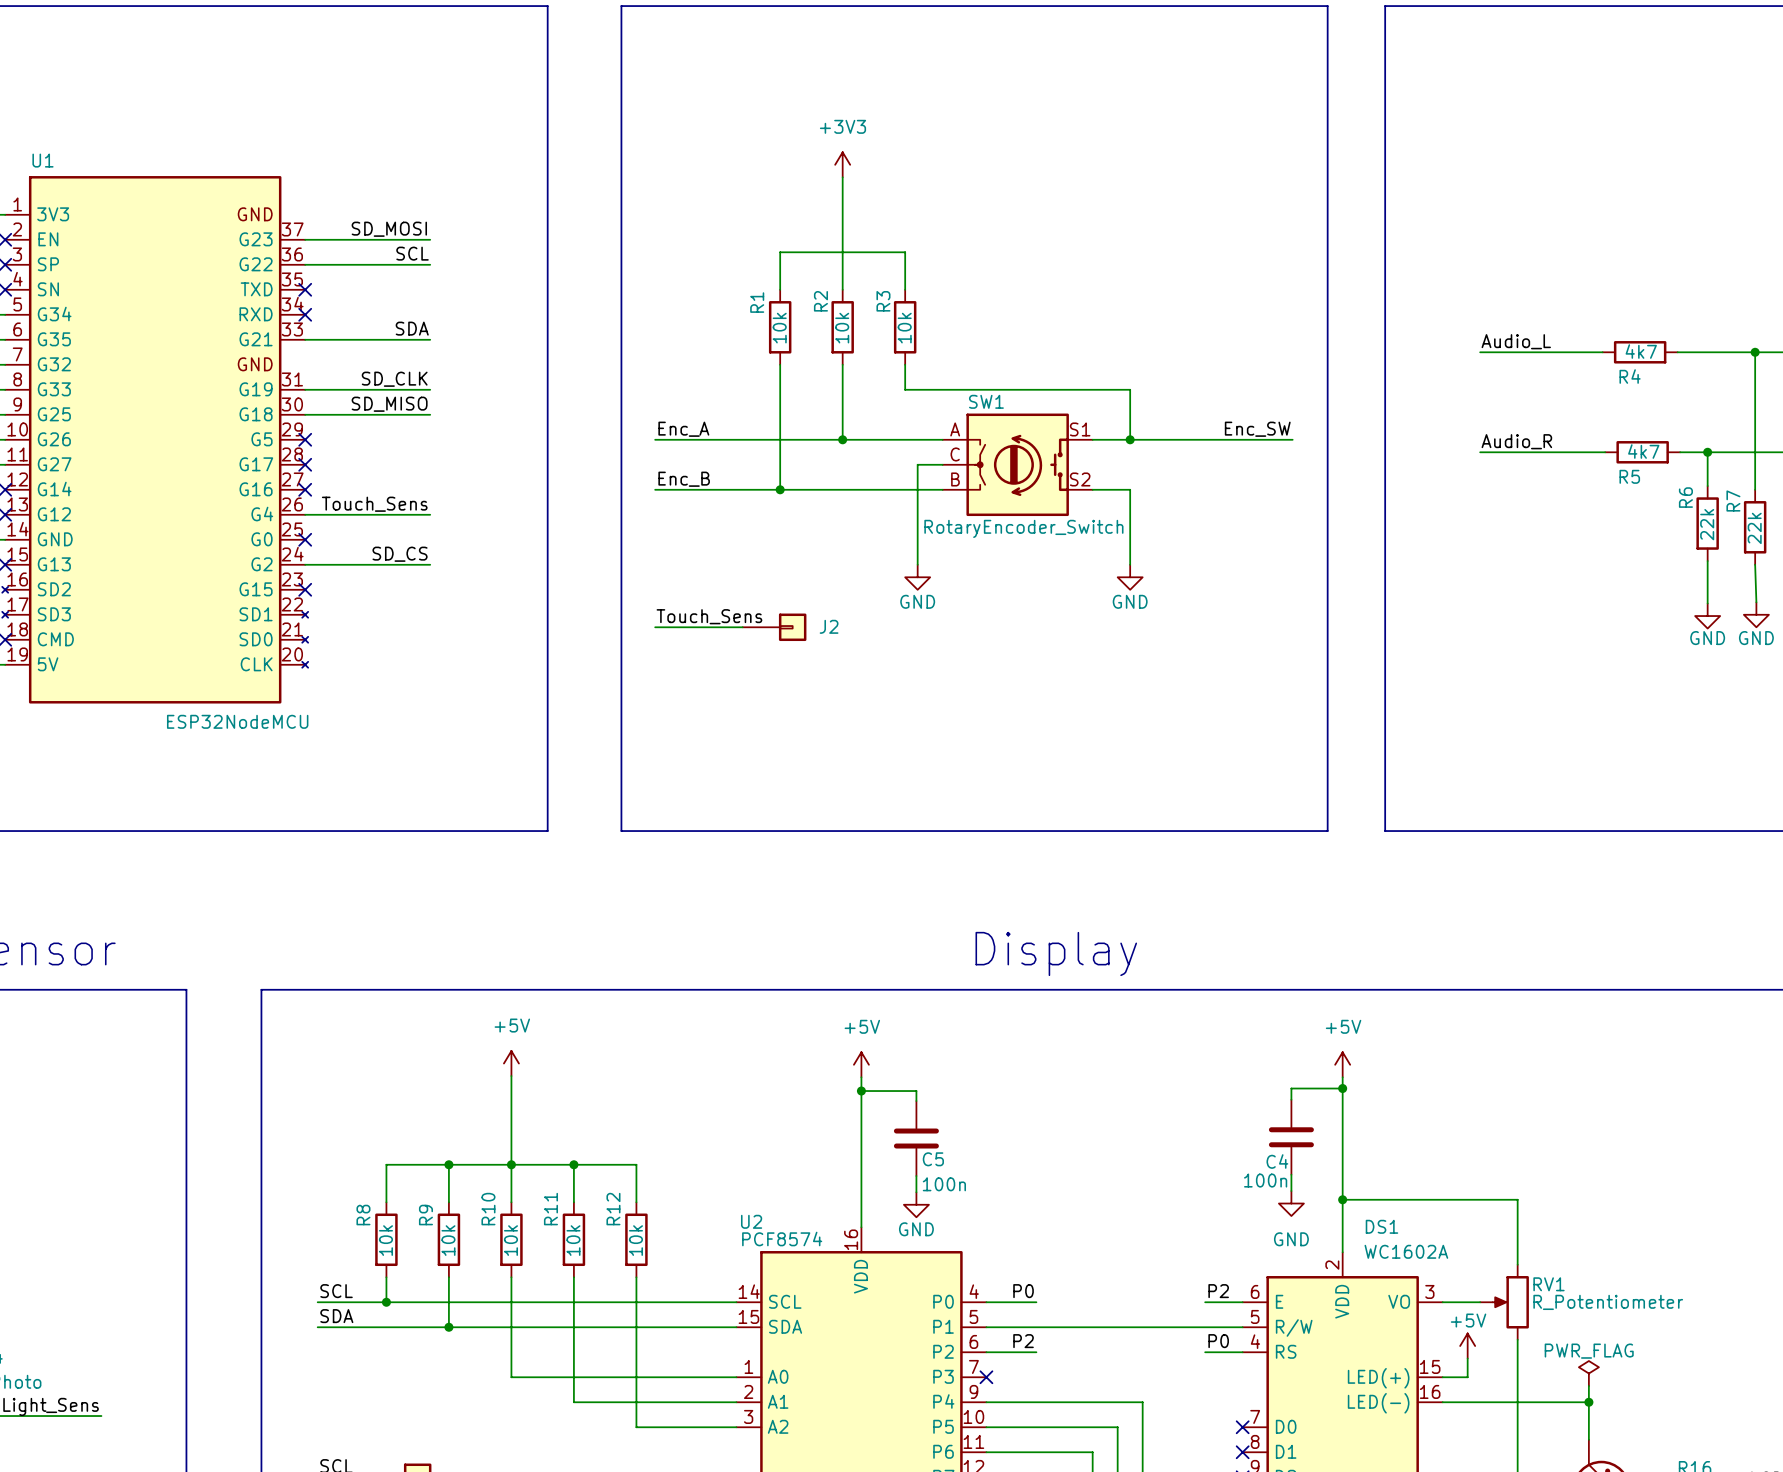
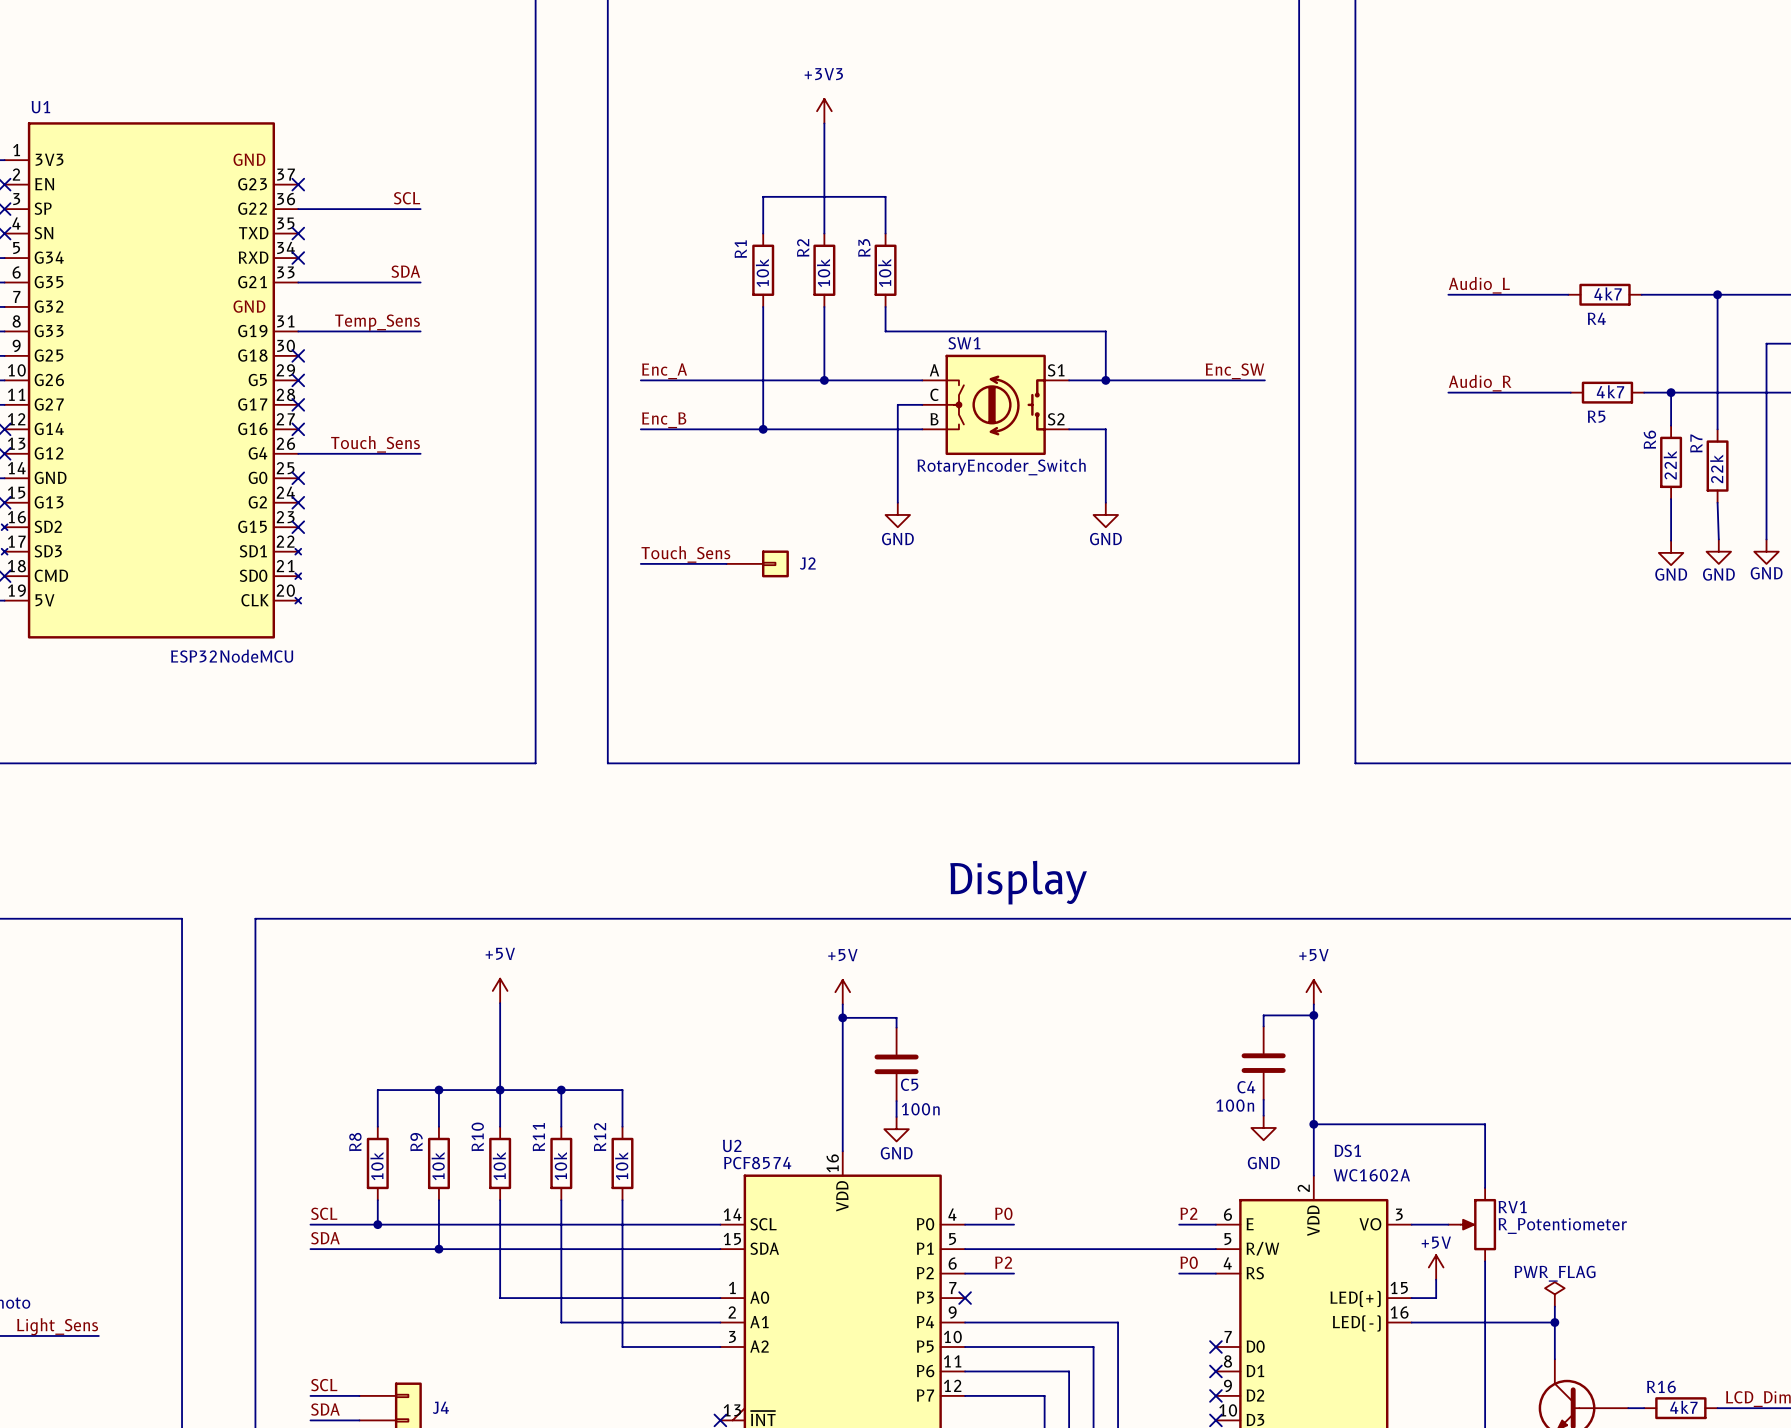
label: SD_MOSI (389, 229) -> none
wire: (305, 239) (430, 239) -> none
no-connect mark: none -> (298, 184)
label: SD_CLK (394, 379) -> Temp_Sens (377, 322)
label: SD_MISO (389, 404) -> none
wire: (305, 414) (430, 414) -> none
no-connect mark: none -> (298, 355)
label: SD_CS (400, 554) -> none
wire: (305, 564) (430, 564) -> none
no-connect mark: none -> (298, 502)

